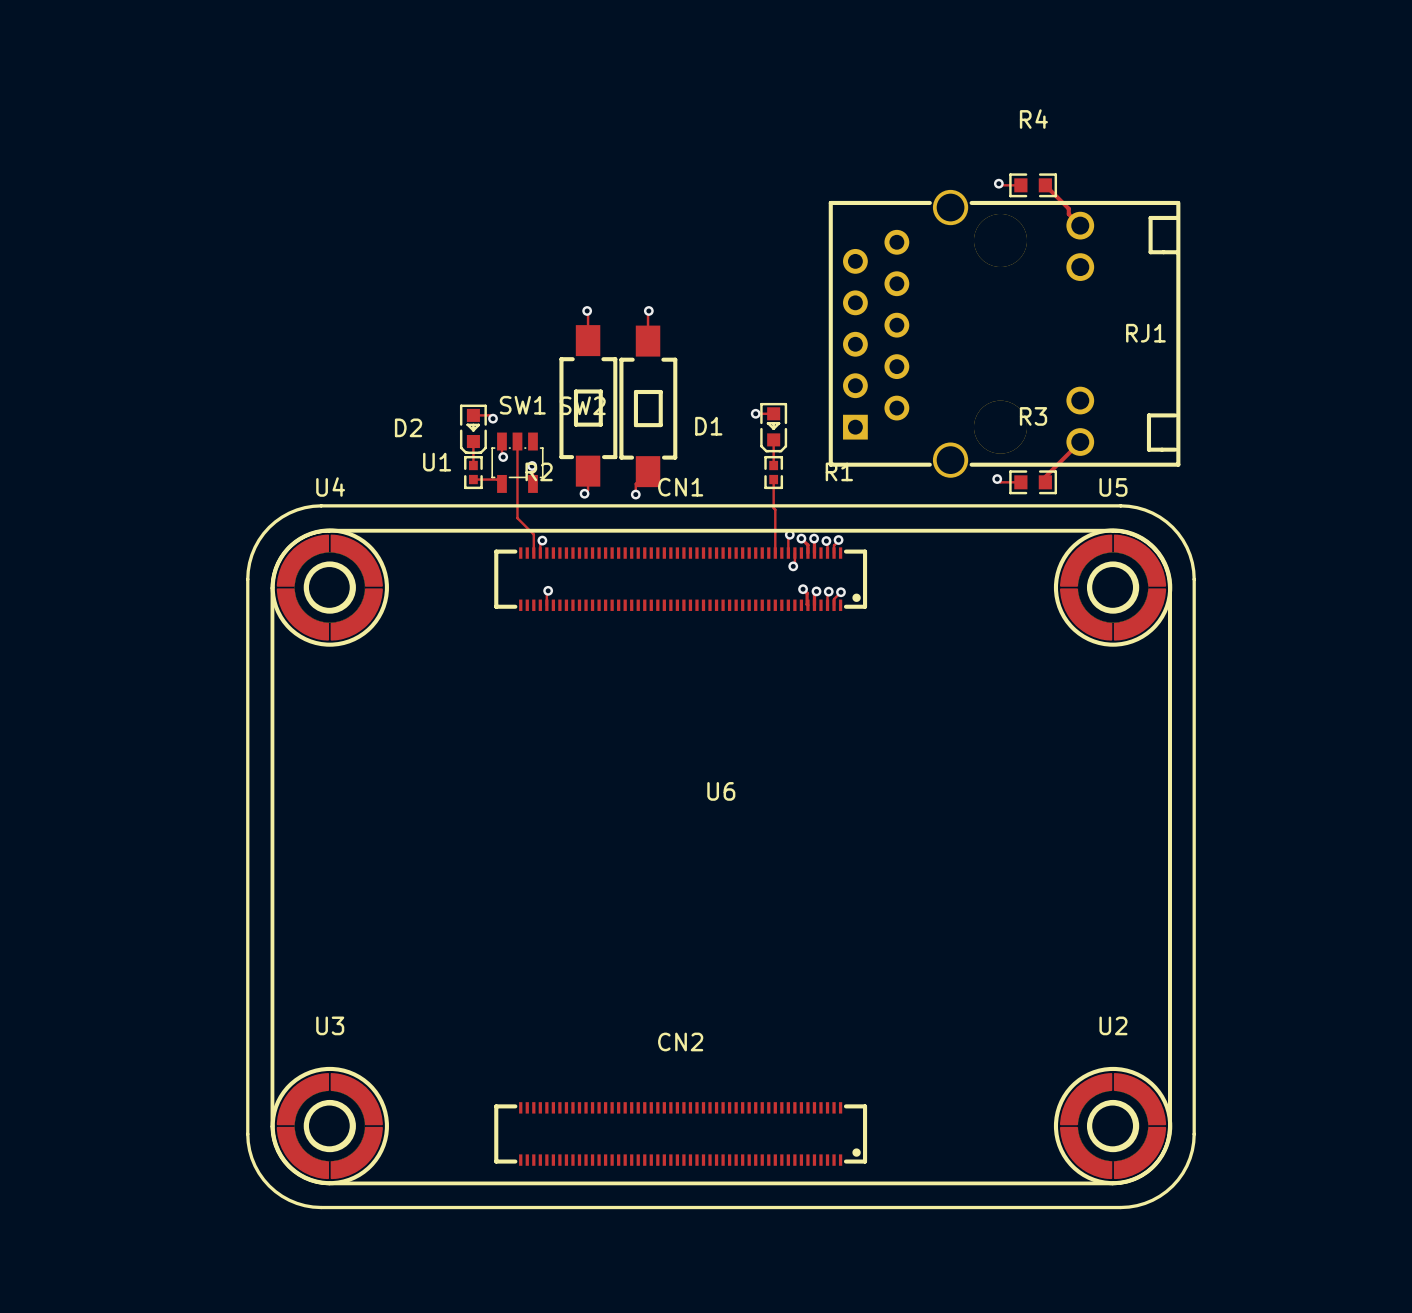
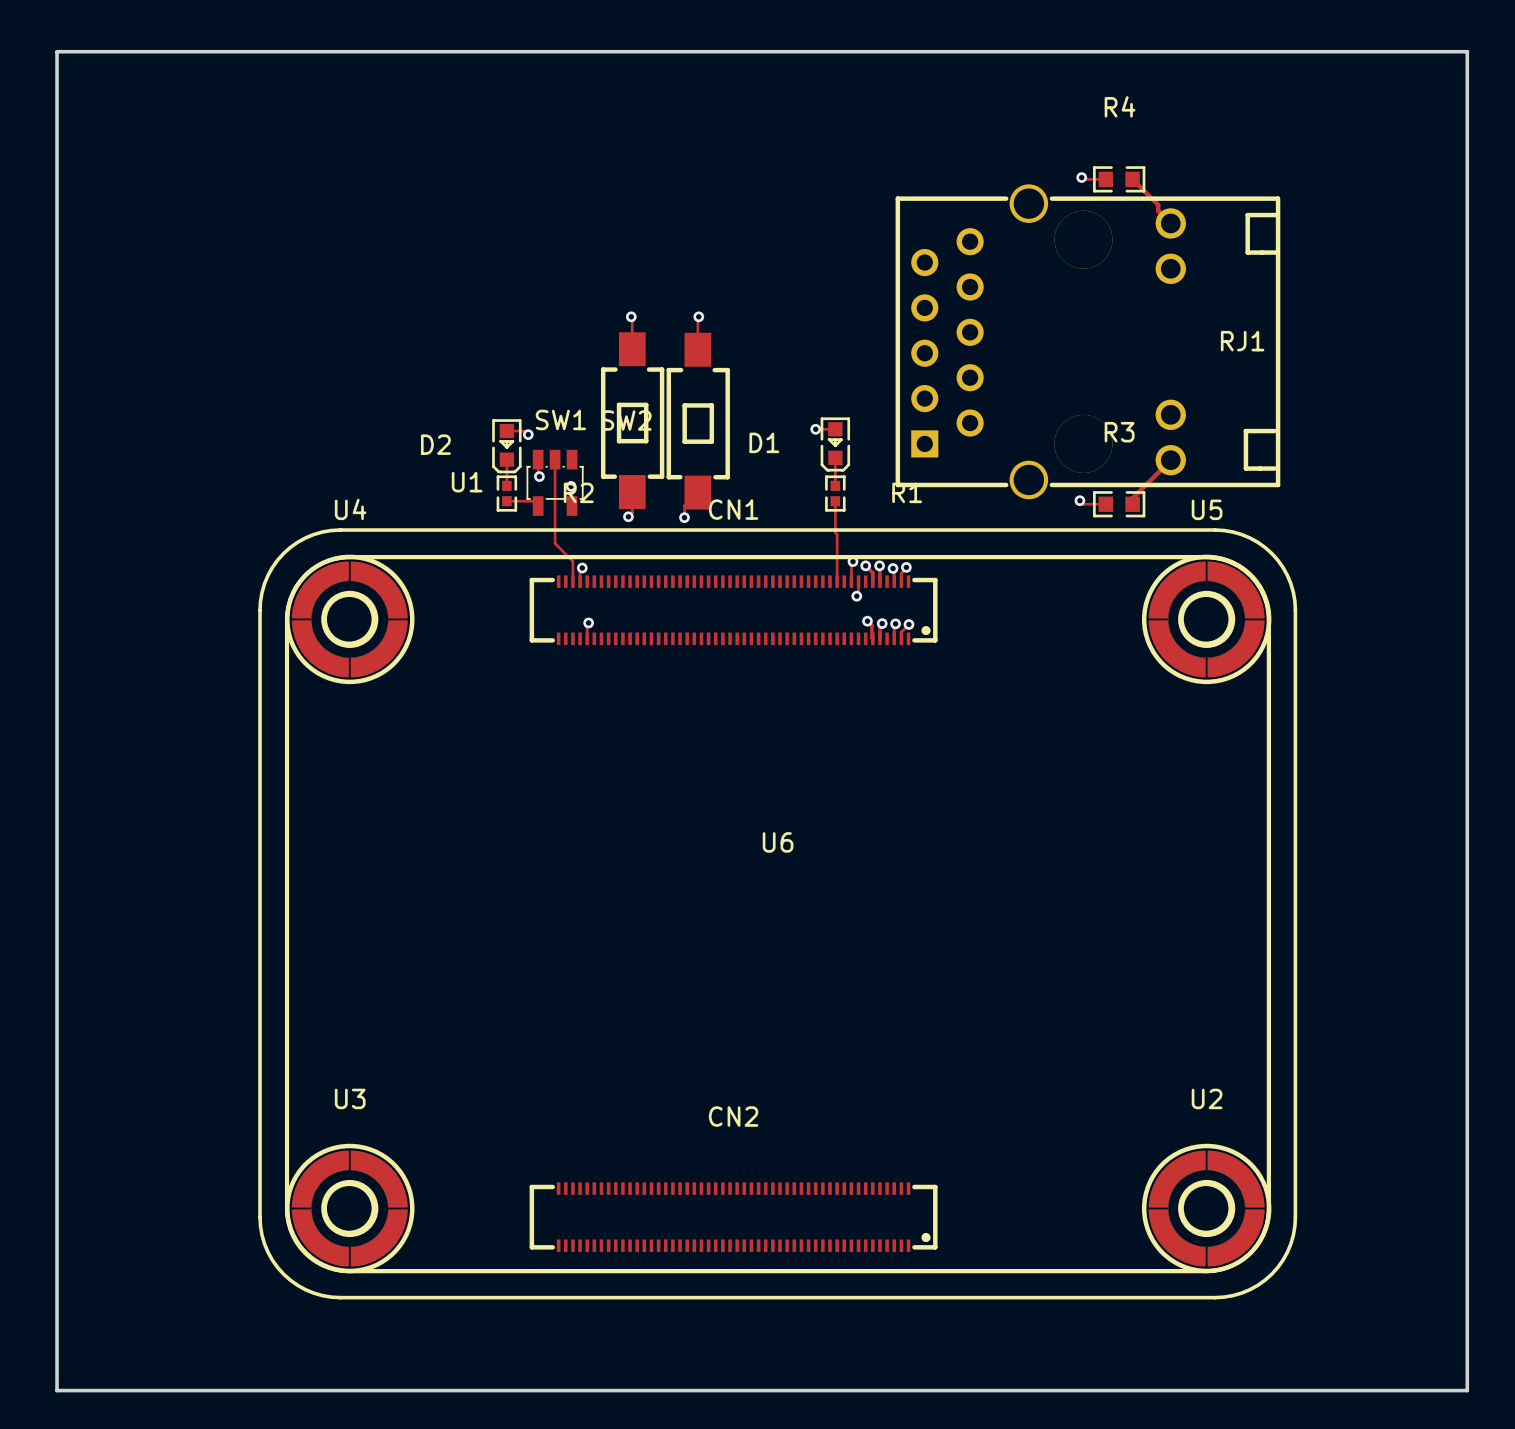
board edge: none -> (57, 51) (1467, 51) (1467, 1390) (57, 1390) (57, 51)

